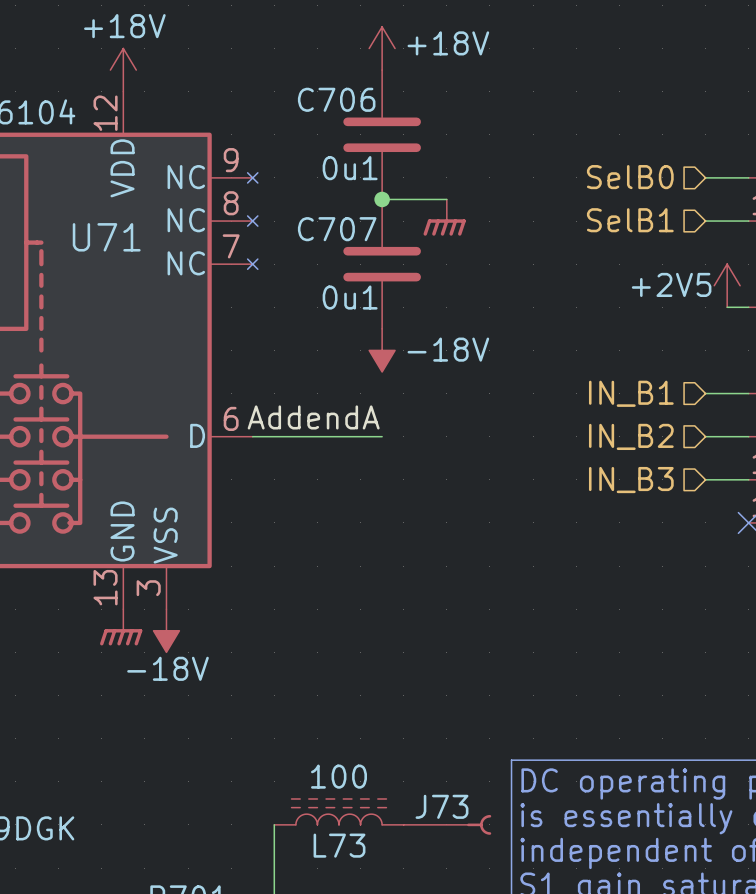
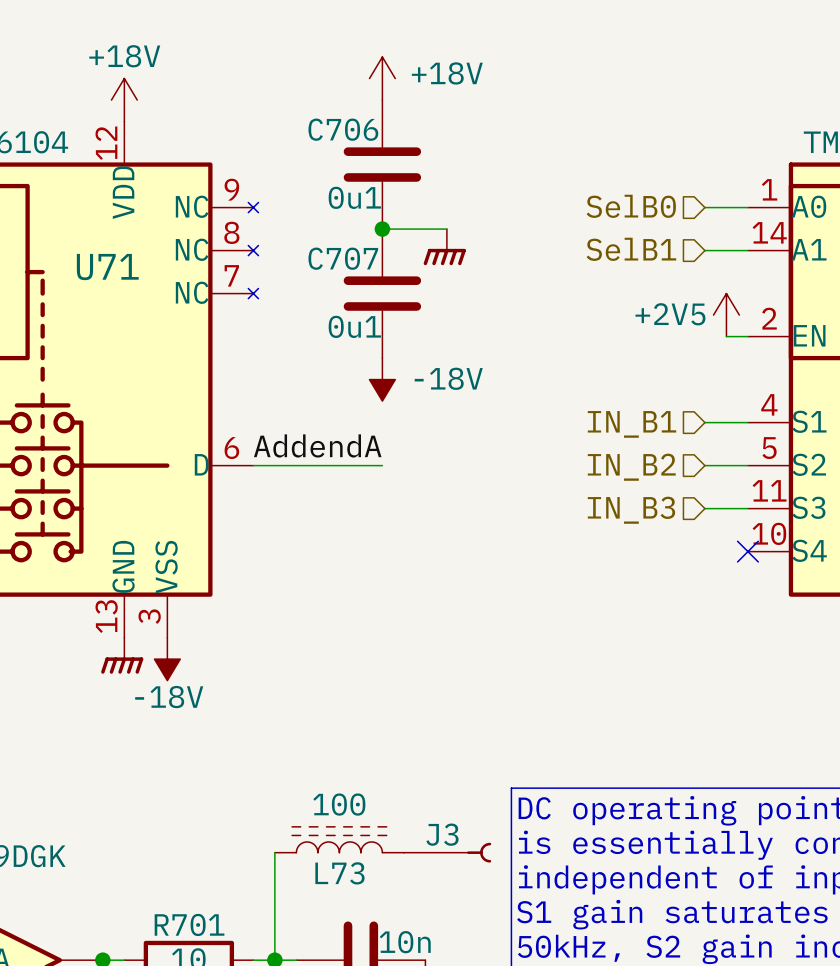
J73 name: J73 (441, 806) -> J3 (442, 834)

